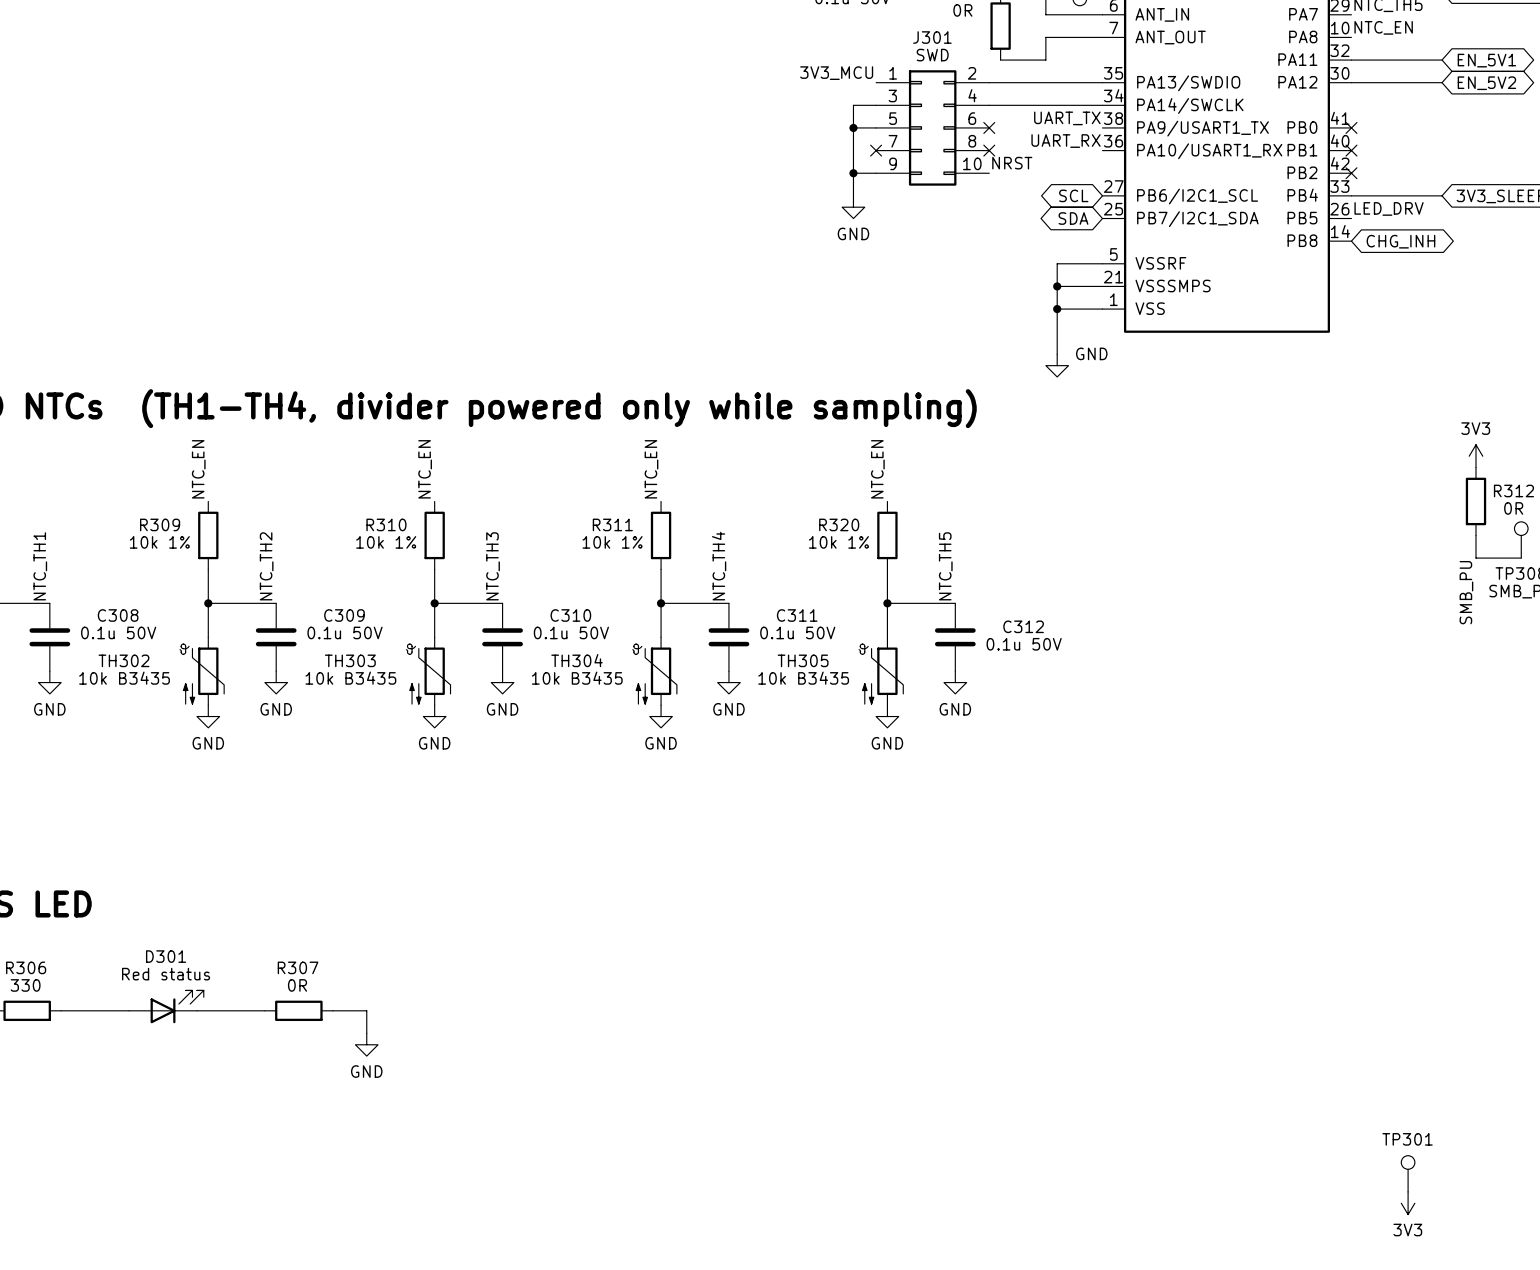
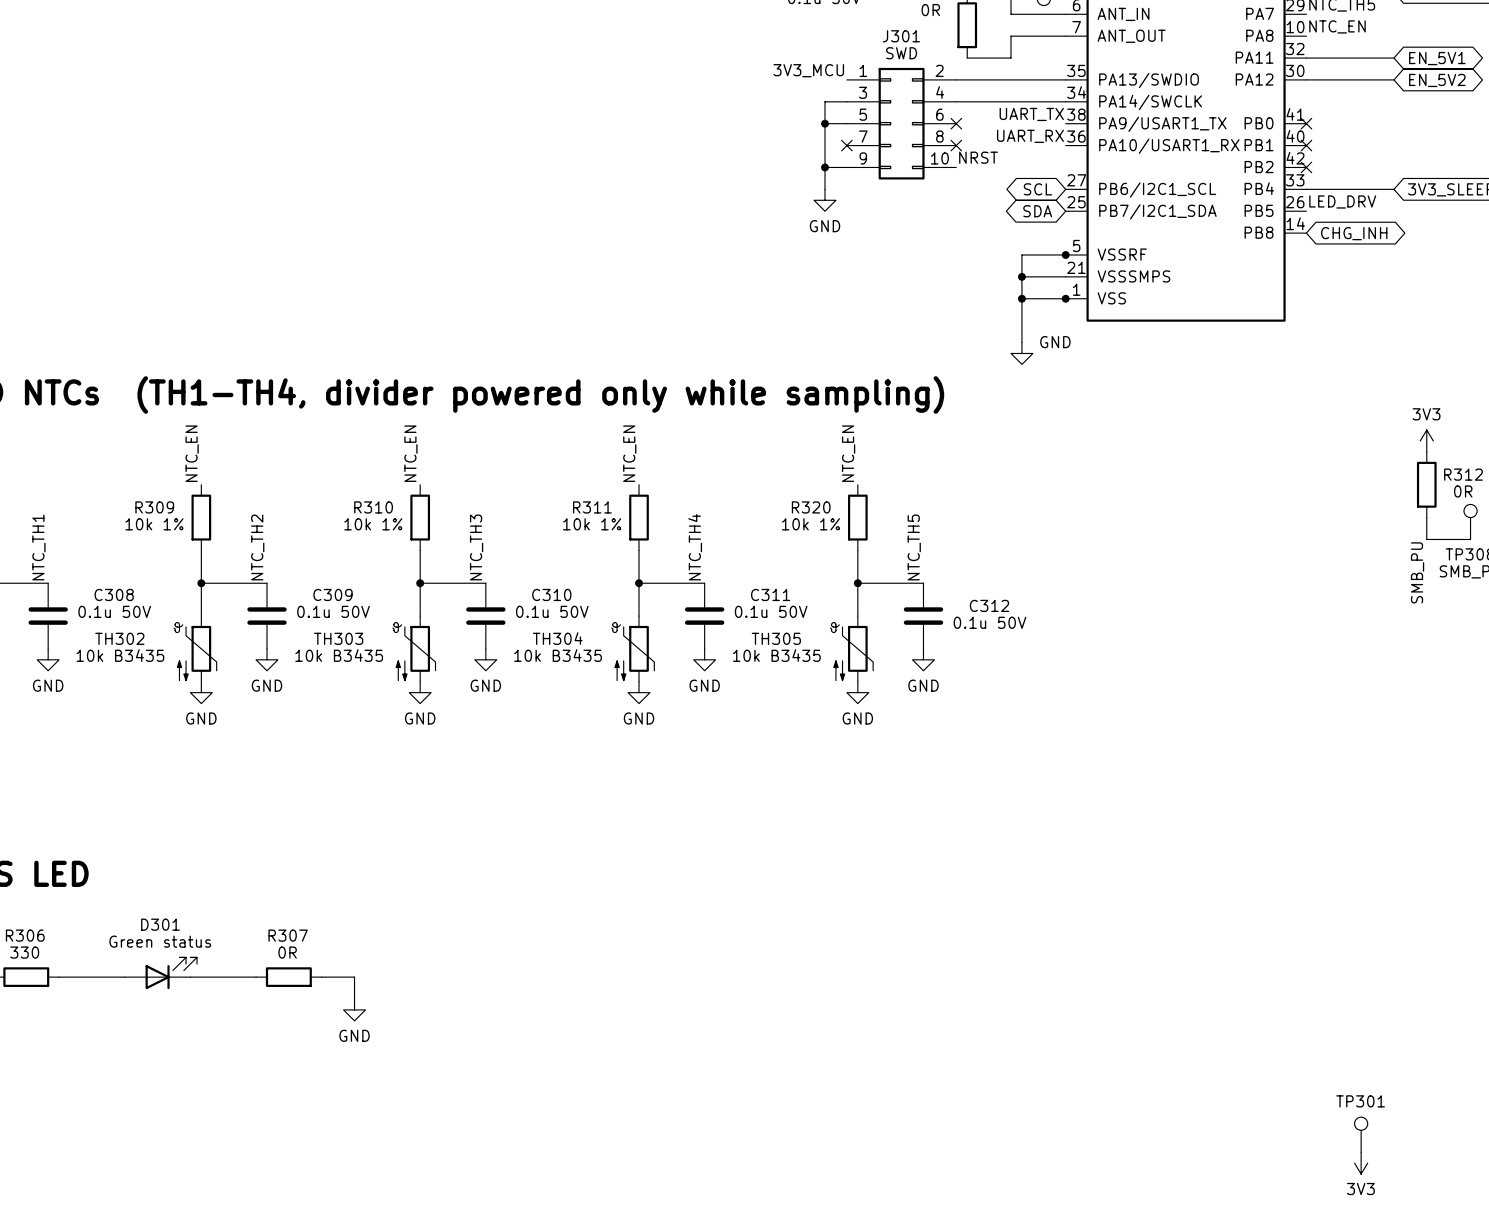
junction: none -> (1065, 254)
junction: none -> (1065, 298)
D301 value: Red status (166, 974) -> Green status (160, 941)

